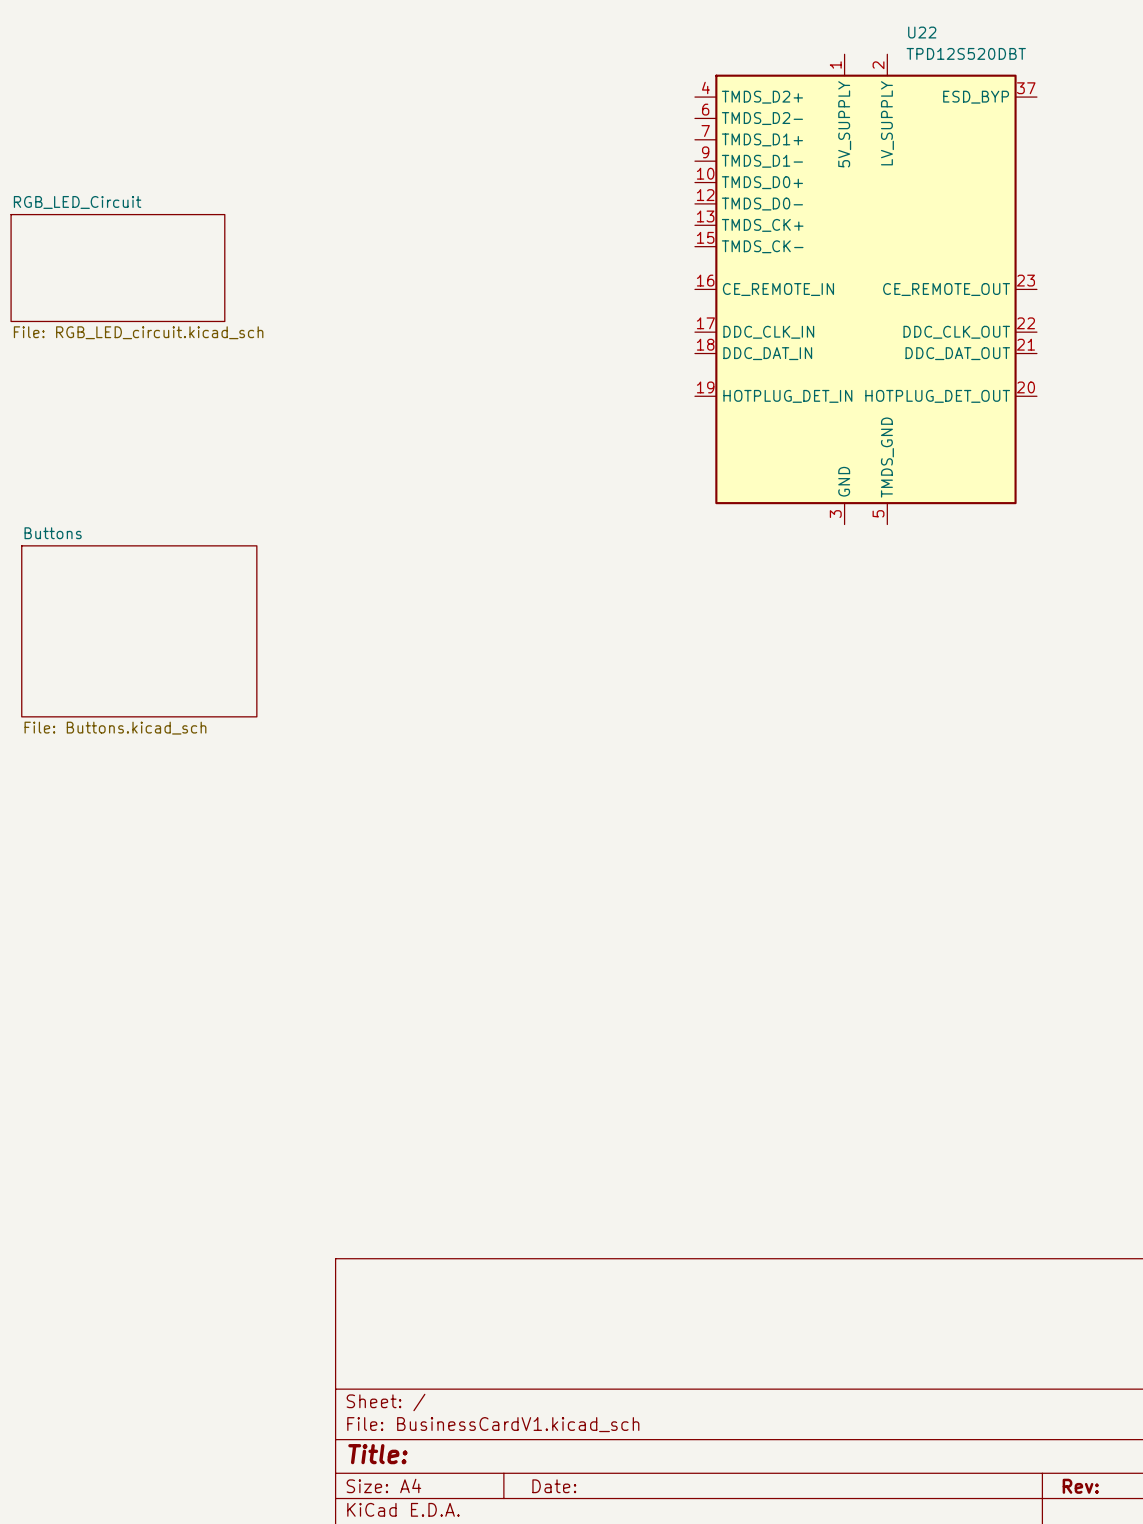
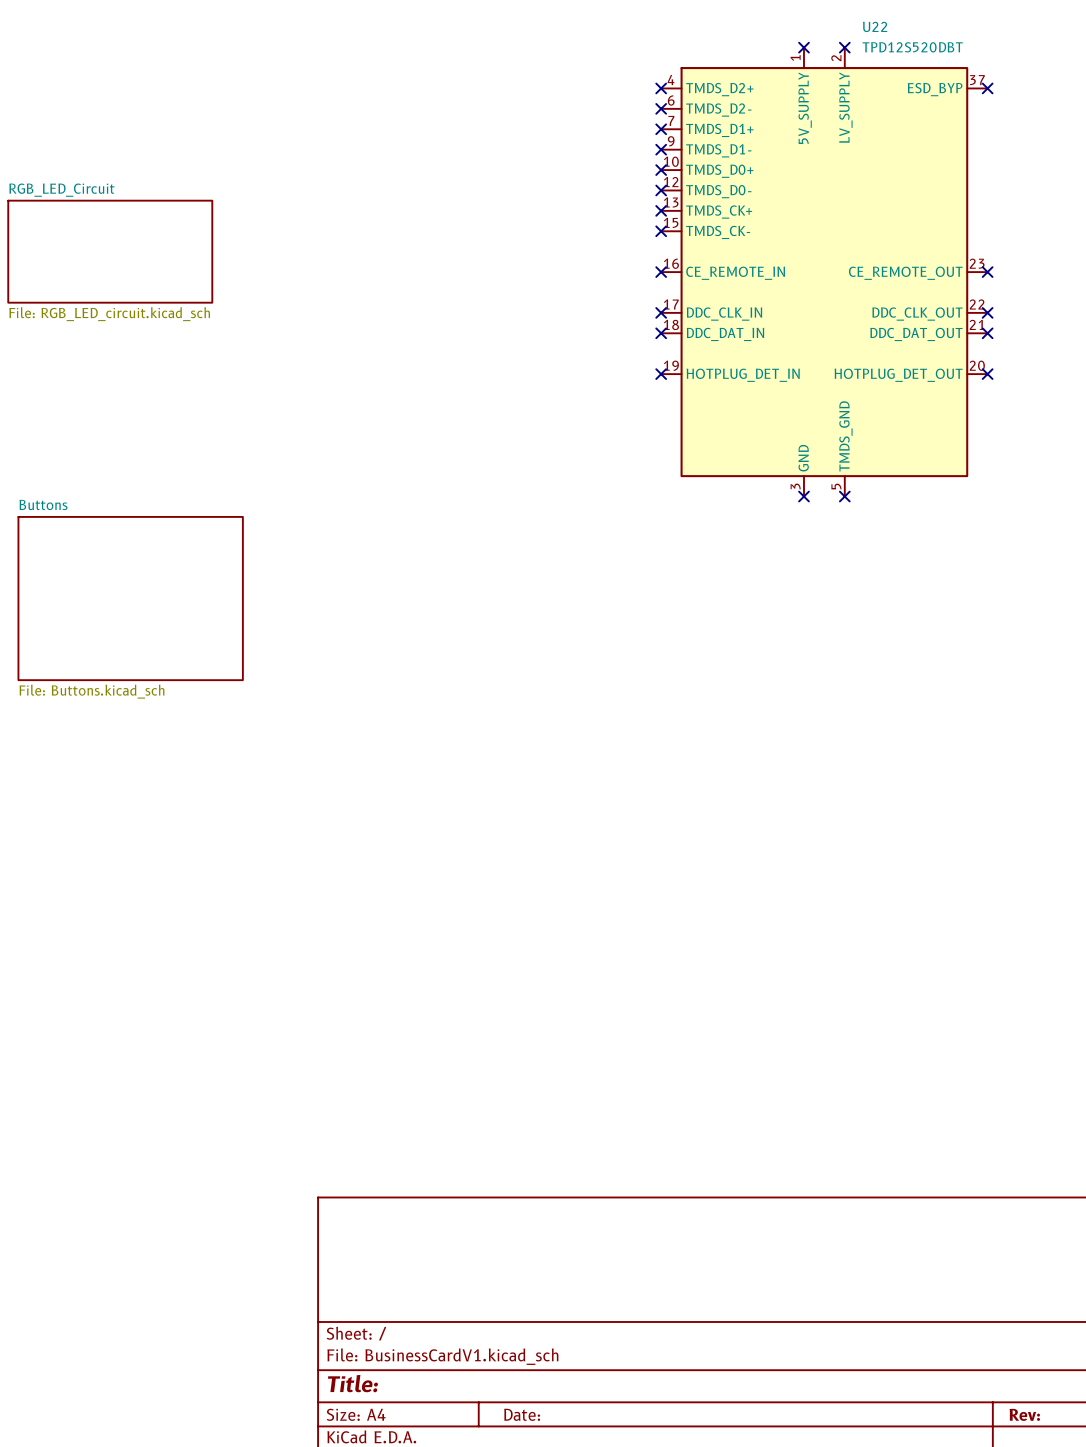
no-connect mark: none -> (803, 47)
no-connect mark: none -> (844, 47)
no-connect mark: none -> (661, 88)
no-connect mark: none -> (987, 88)
no-connect mark: none -> (661, 108)
no-connect mark: none -> (661, 129)
no-connect mark: none -> (661, 149)
no-connect mark: none -> (661, 170)
no-connect mark: none -> (661, 190)
no-connect mark: none -> (661, 210)
no-connect mark: none -> (661, 231)
no-connect mark: none -> (661, 272)
no-connect mark: none -> (987, 272)
no-connect mark: none -> (661, 312)
no-connect mark: none -> (987, 312)
no-connect mark: none -> (661, 333)
no-connect mark: none -> (987, 333)
no-connect mark: none -> (661, 374)
no-connect mark: none -> (987, 374)
no-connect mark: none -> (803, 496)
no-connect mark: none -> (844, 496)

